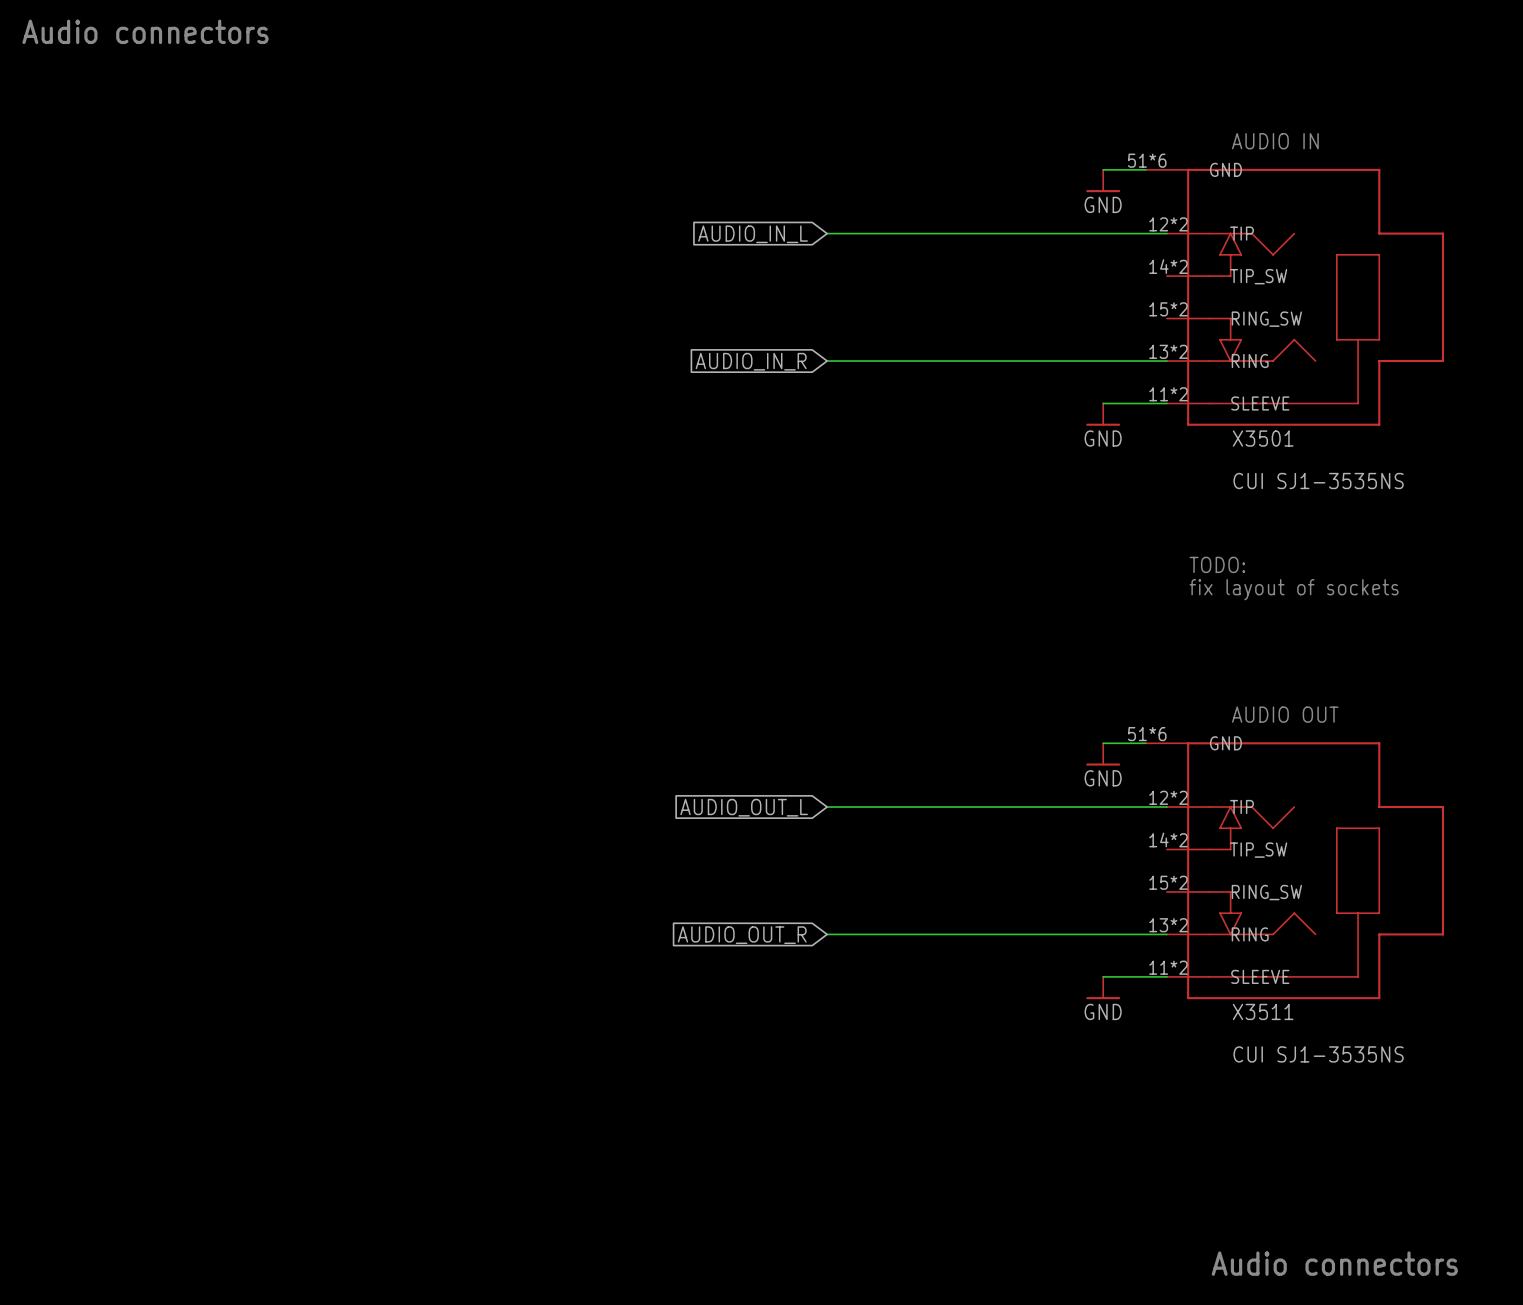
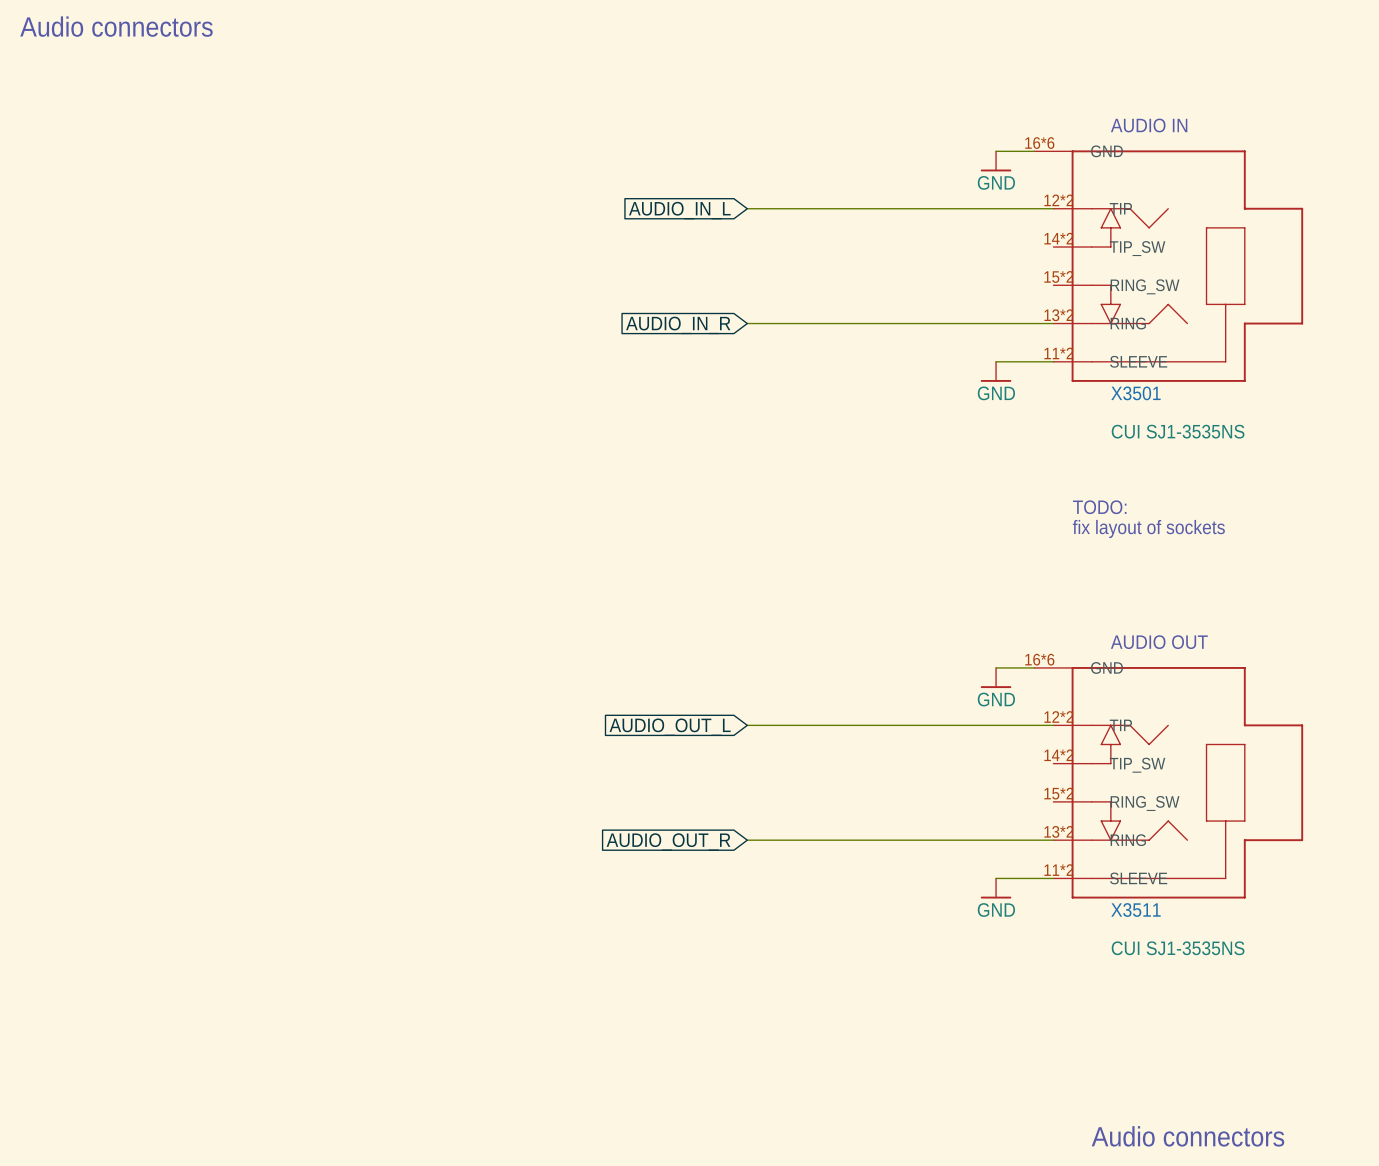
X3501 pin number: 51*6 (1147, 160) -> 16*6 (1039, 143)
X3511 pin number: 51*6 (1147, 734) -> 16*6 (1039, 659)

